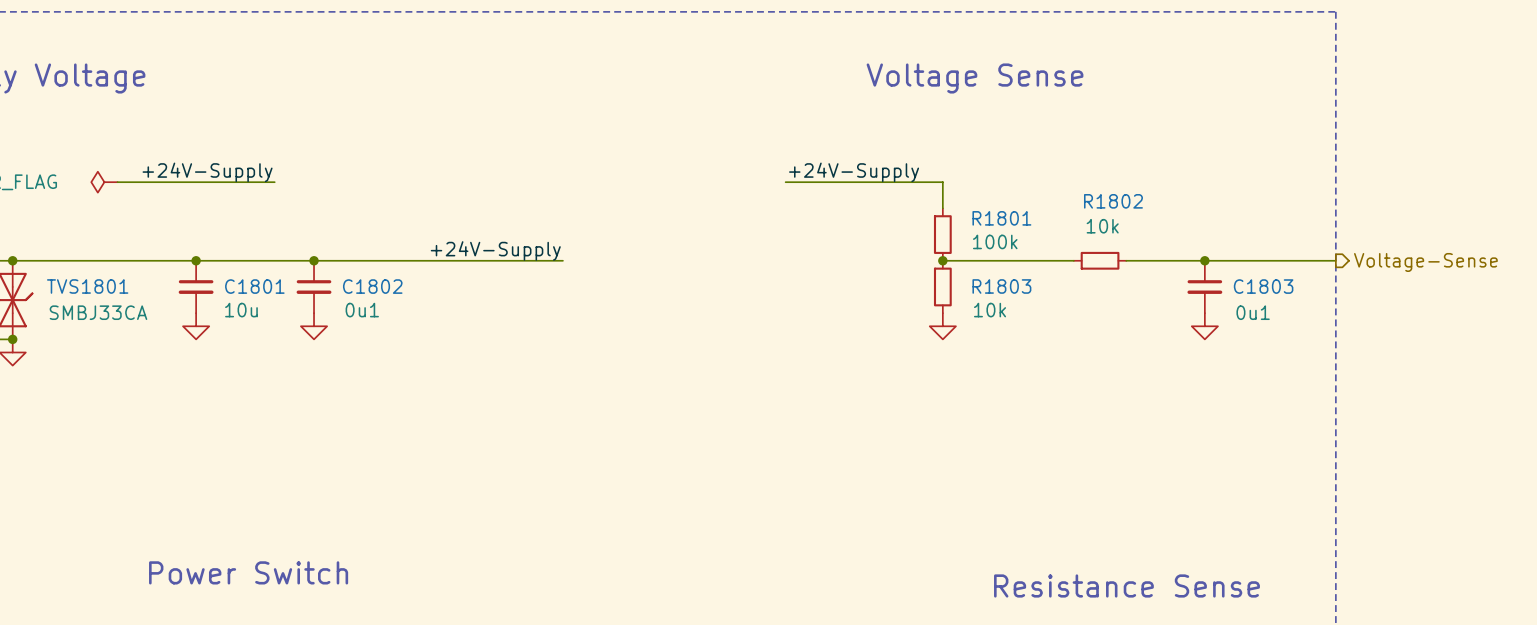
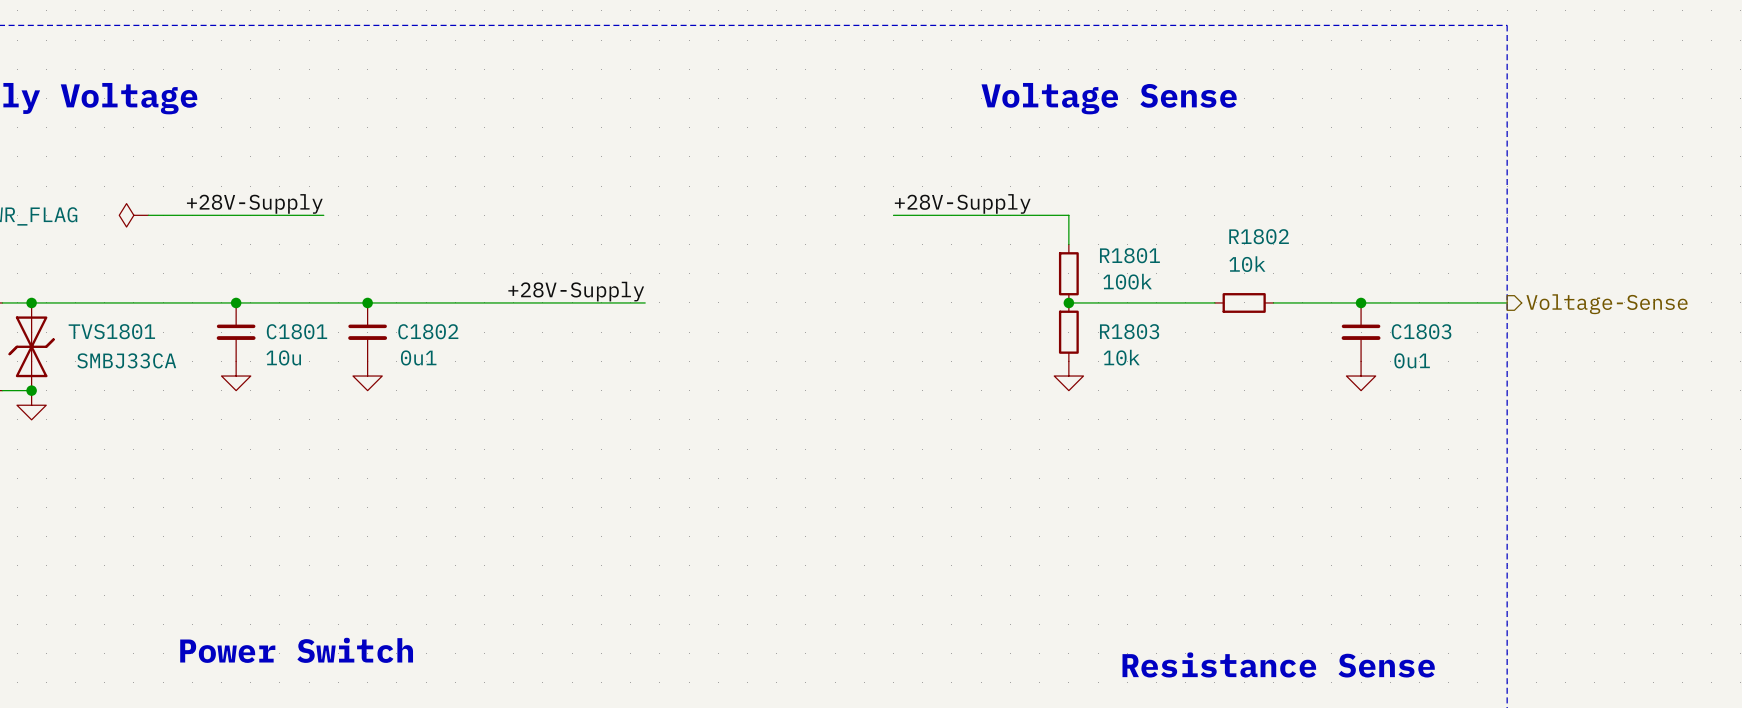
label: +24V-Supply (207, 172) -> +28V-Supply (254, 203)
label: +24V-Supply (854, 172) -> +28V-Supply (962, 203)
label: +24V-Supply (495, 250) -> +28V-Supply (576, 291)

